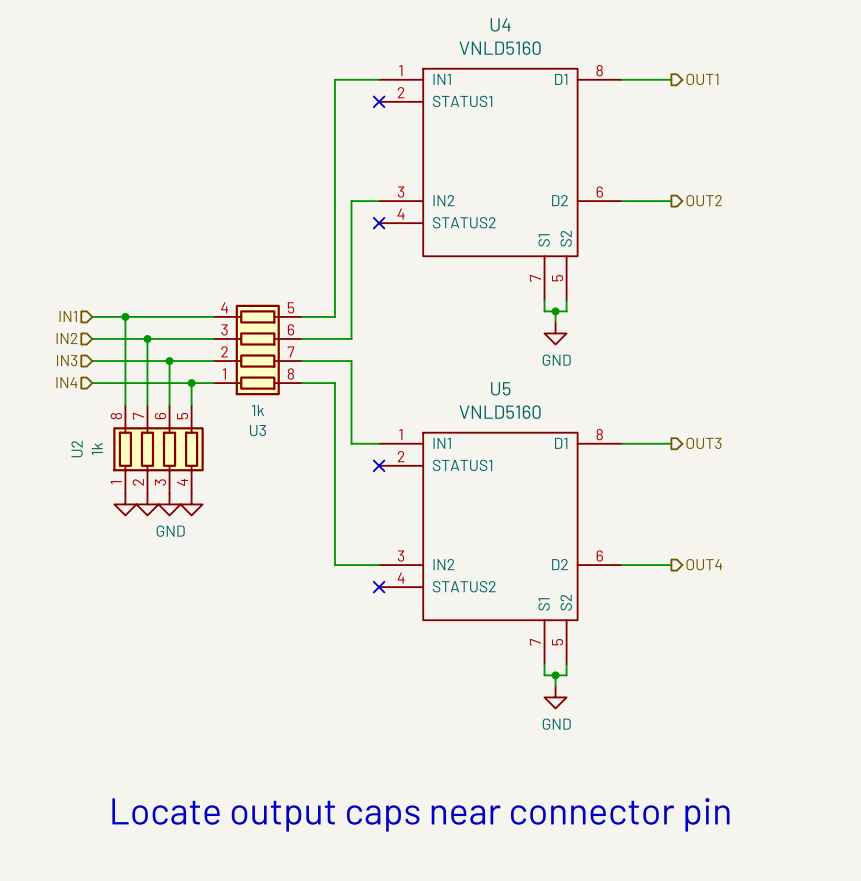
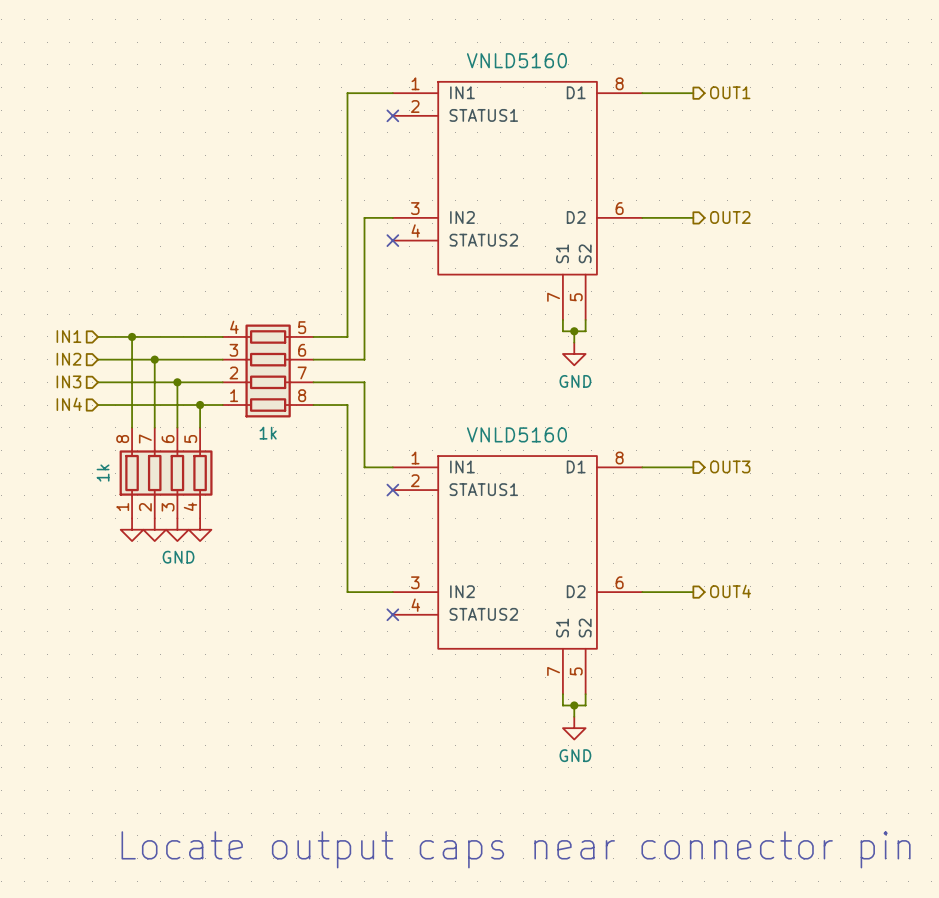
U4 name: U4 (500, 24) -> none
U5 name: U5 (500, 388) -> none
U3 name: U3 (257, 430) -> none
U2 name: U2 (77, 449) -> none

